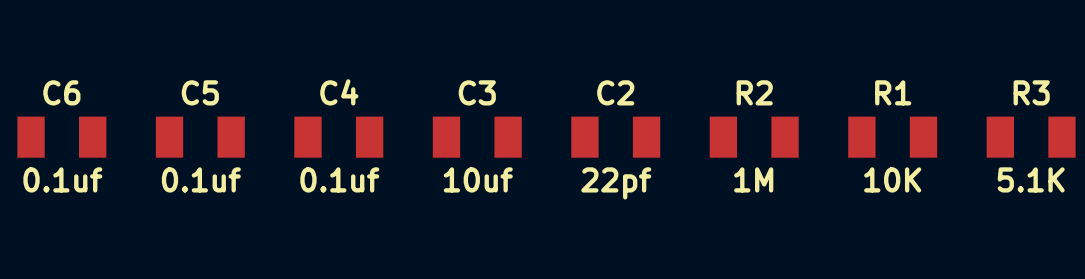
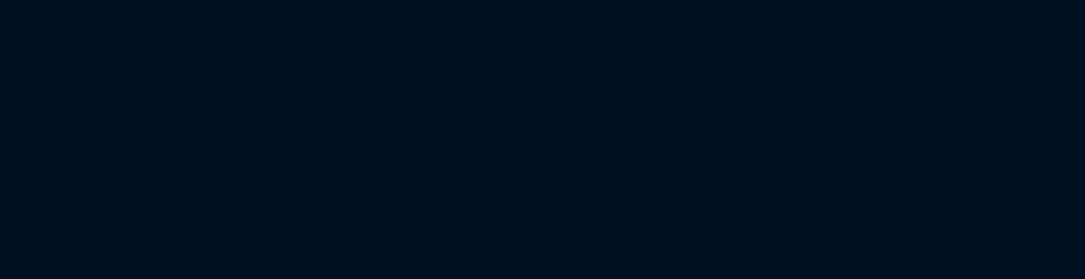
C6: 0.1uf (61, 137) -> none
C5: 0.1uf (200, 137) -> none
C4: 0.1uf (338, 137) -> none
C3: 10uf (477, 137) -> none
C2: 22pf (615, 137) -> none
R2: 1M (754, 137) -> none
R1: 10K (892, 137) -> none
R3: 5.1K (1031, 137) -> none

